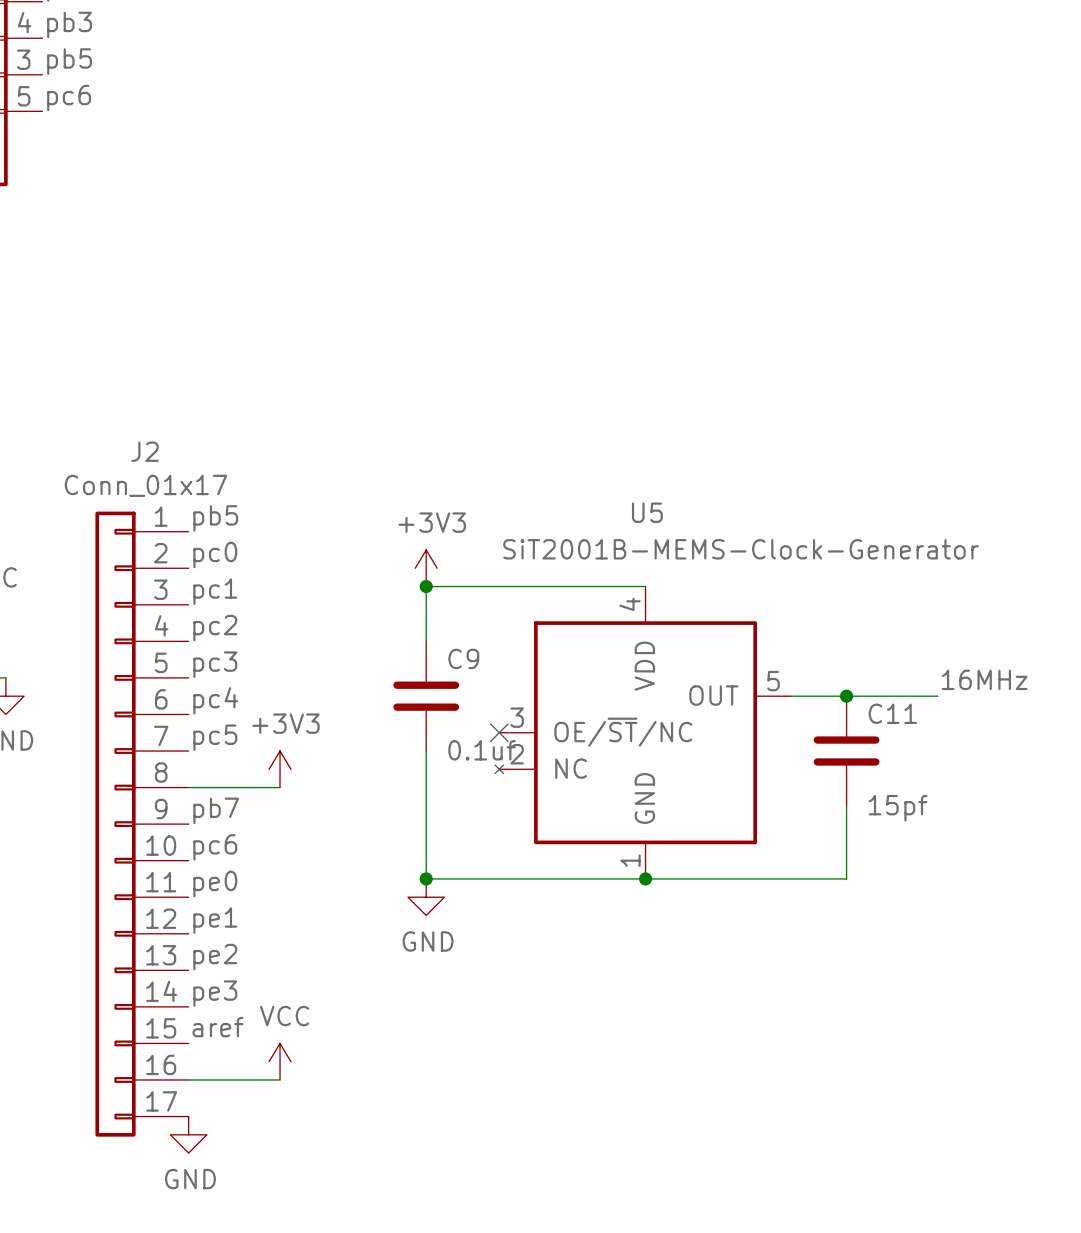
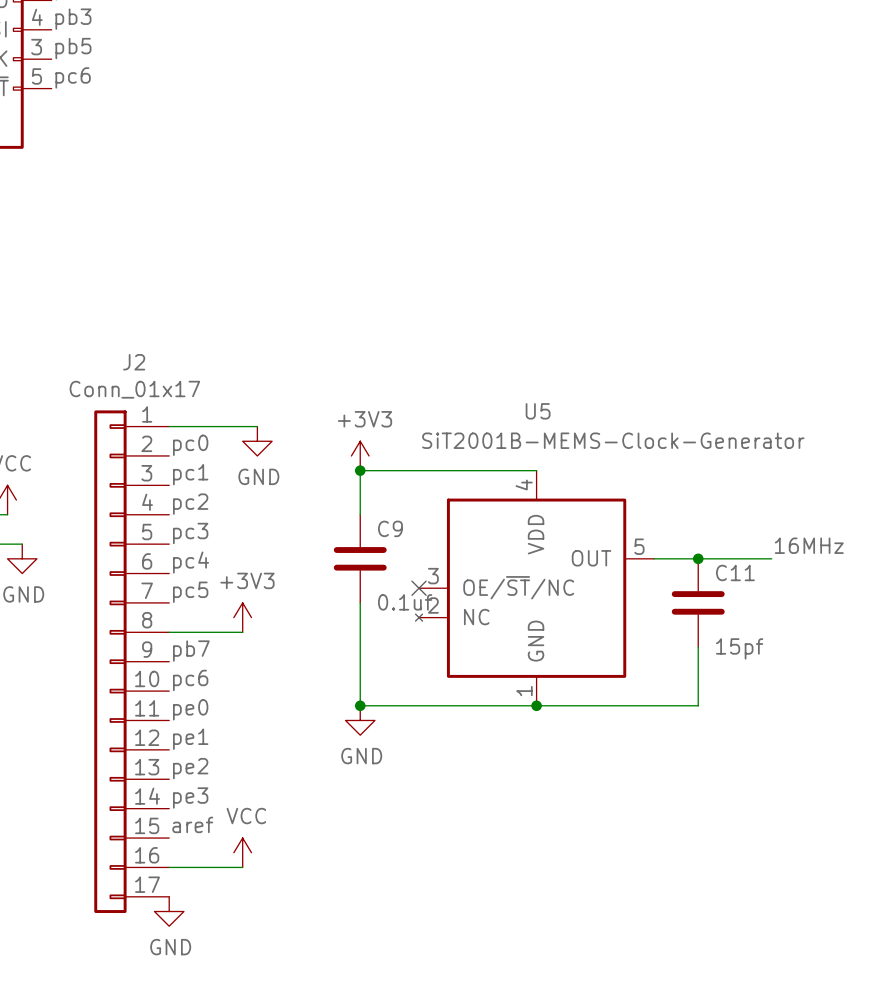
label: pb5 (215, 518) -> none
wire: none -> (169, 426) (257, 426)
power symbol: none -> GND (257, 441)

